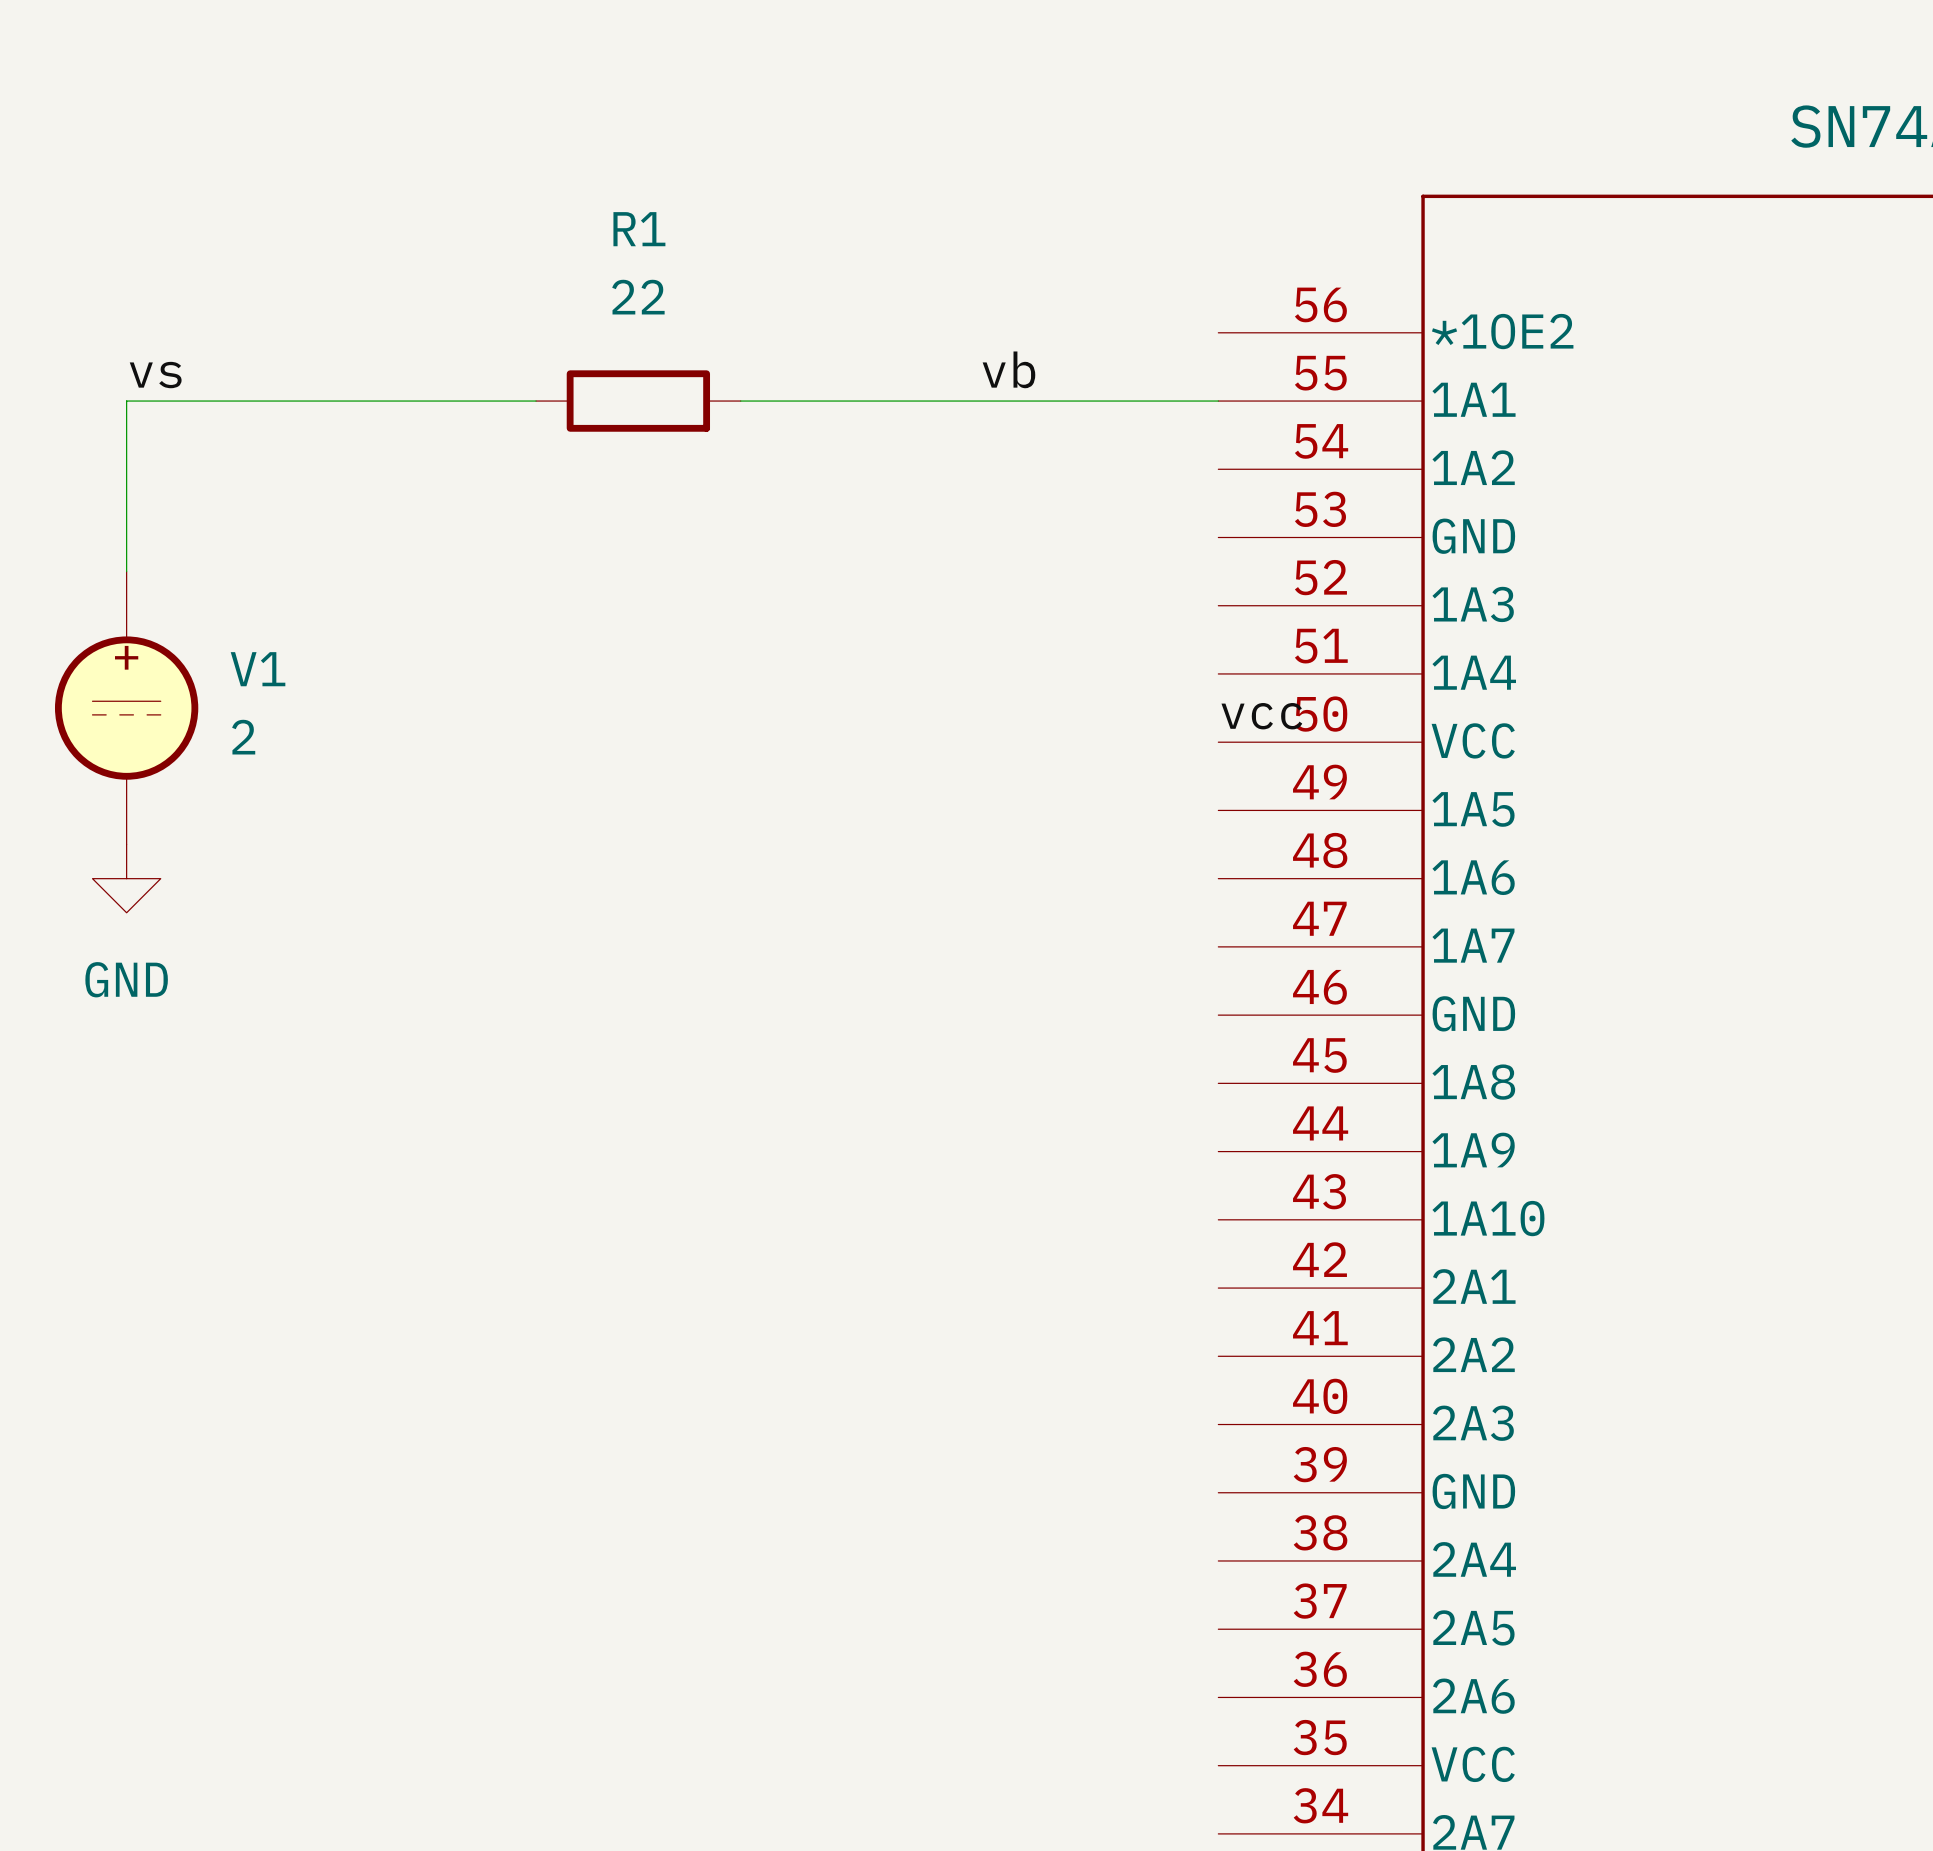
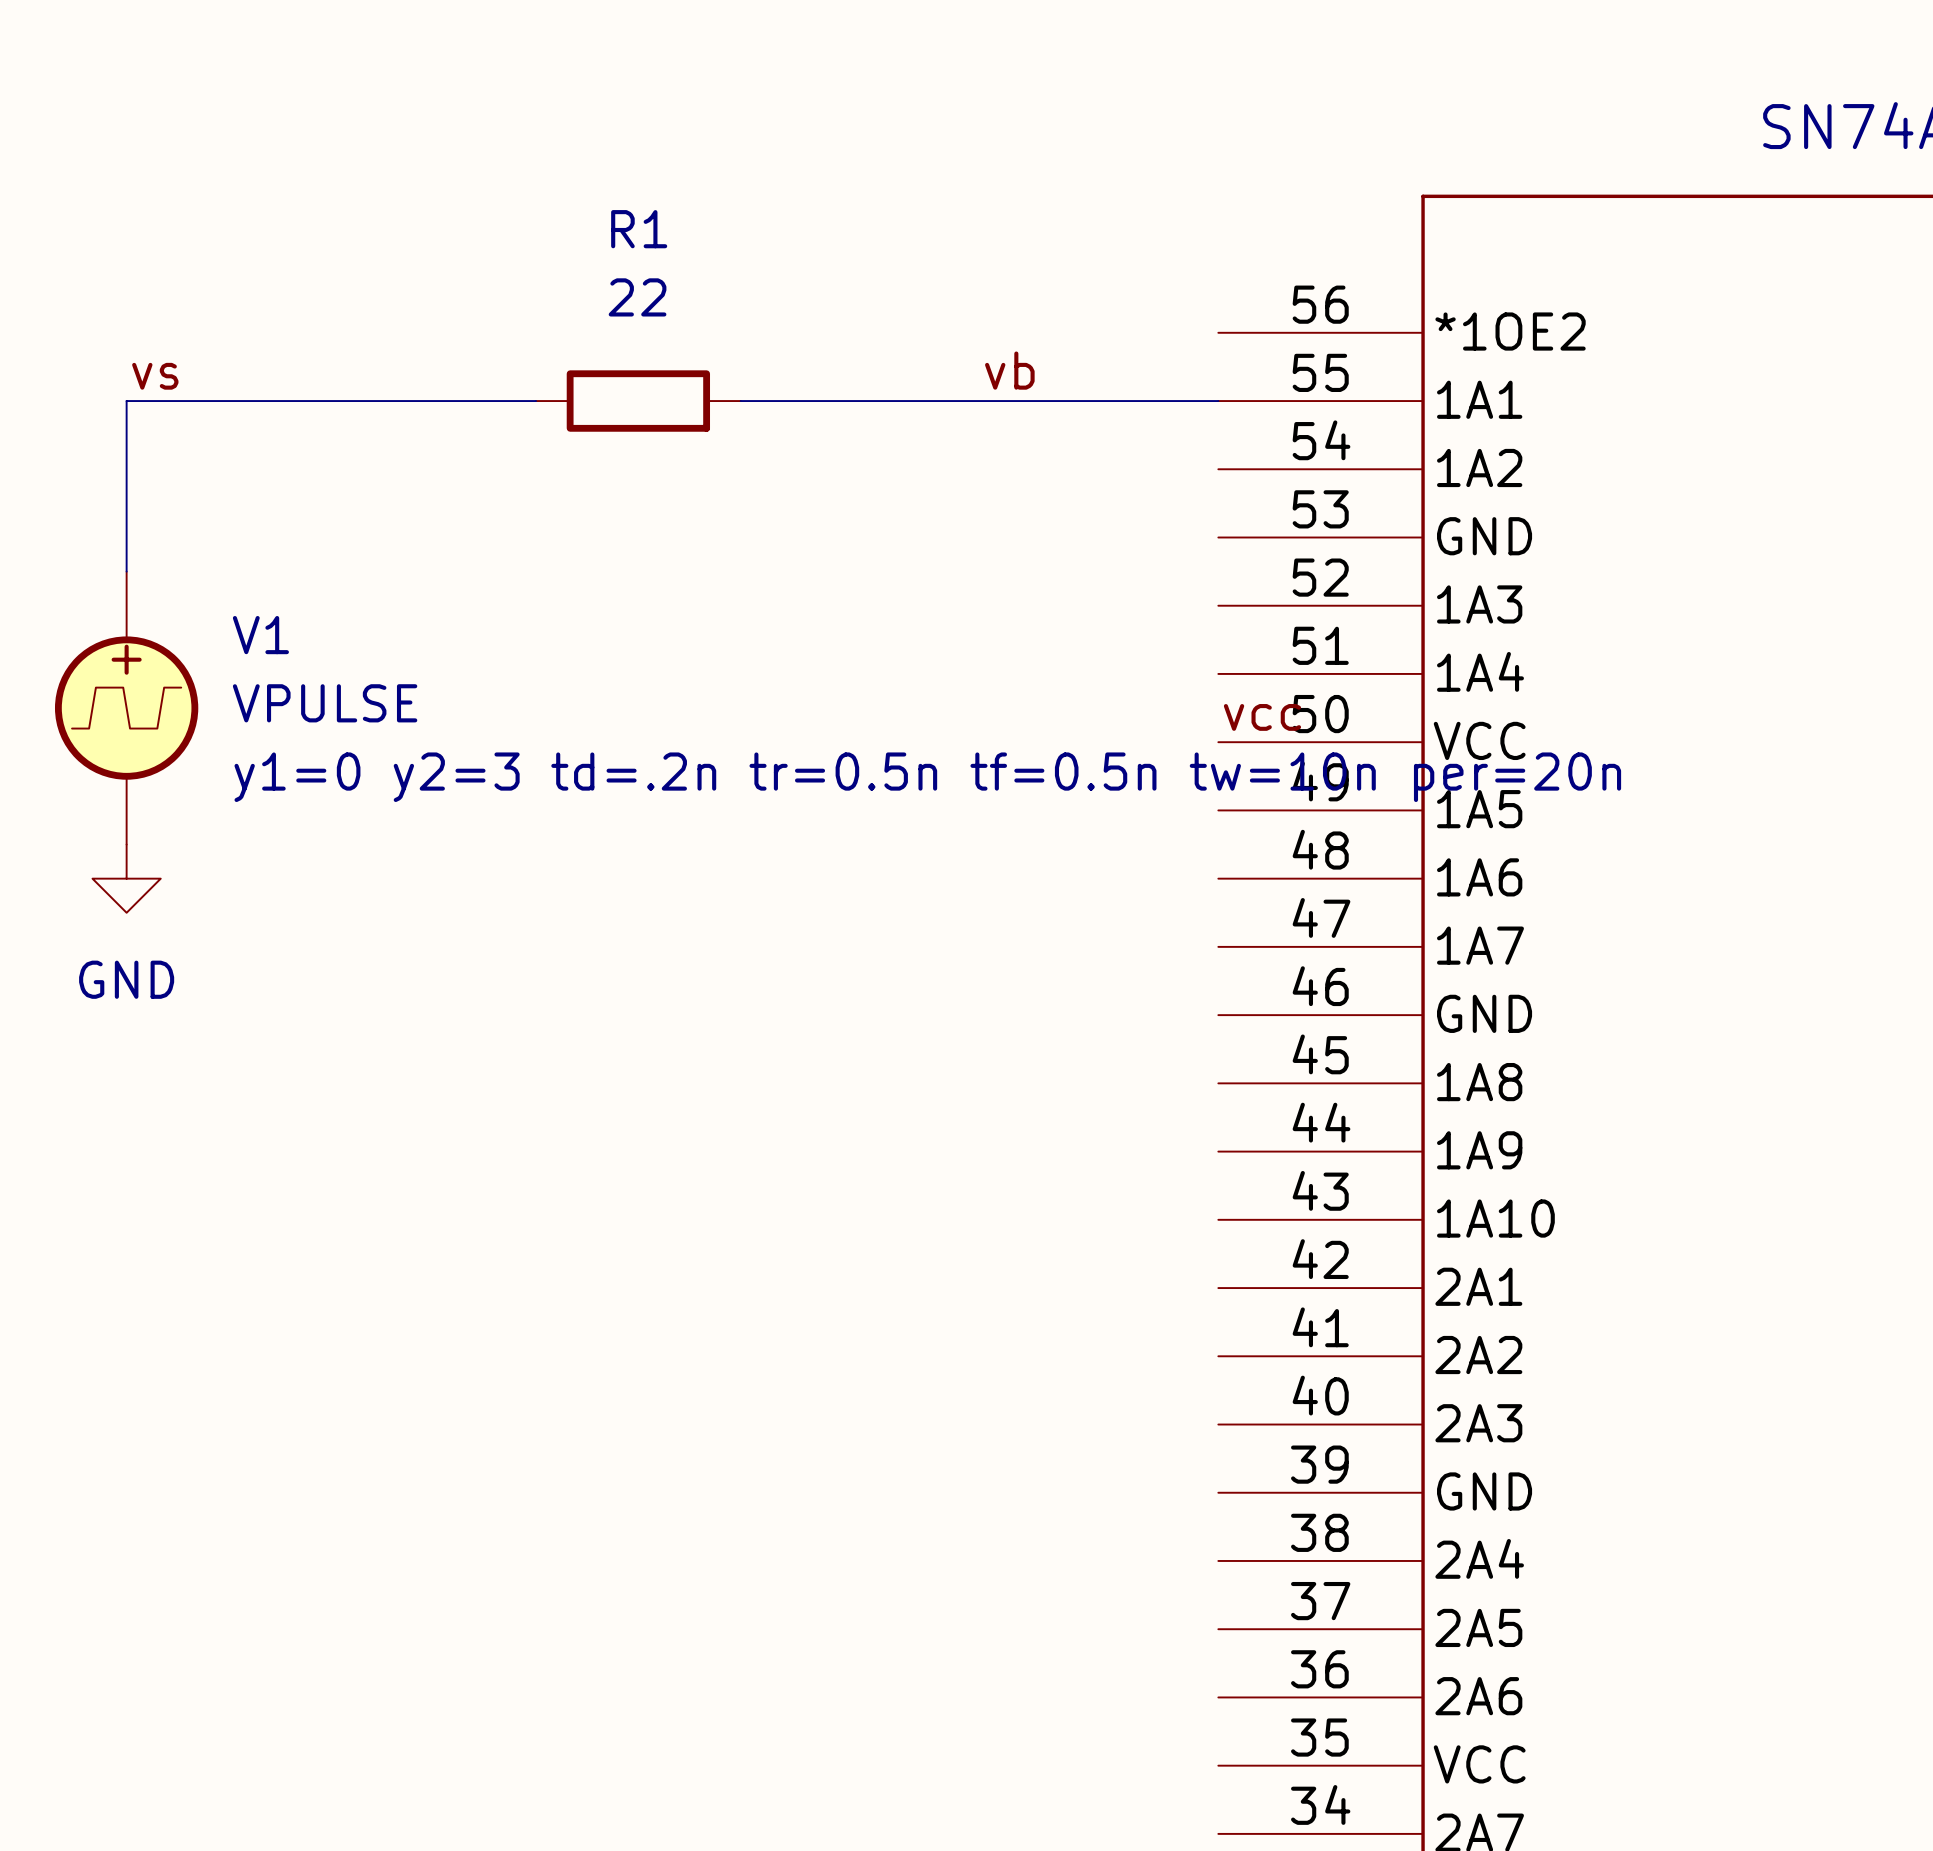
V1 symbol: [54, 571, 199, 845] -> [54, 571, 199, 845]
V1 name position: V1 (258, 669) -> V1 (260, 635)
V1 value: 2 (243, 737) -> VPULSE (325, 703)
V1 text: none -> y1=0 y2=3 td=.2n tr=0.5n tf=0.5n tw=10n per=20n (927, 777)

